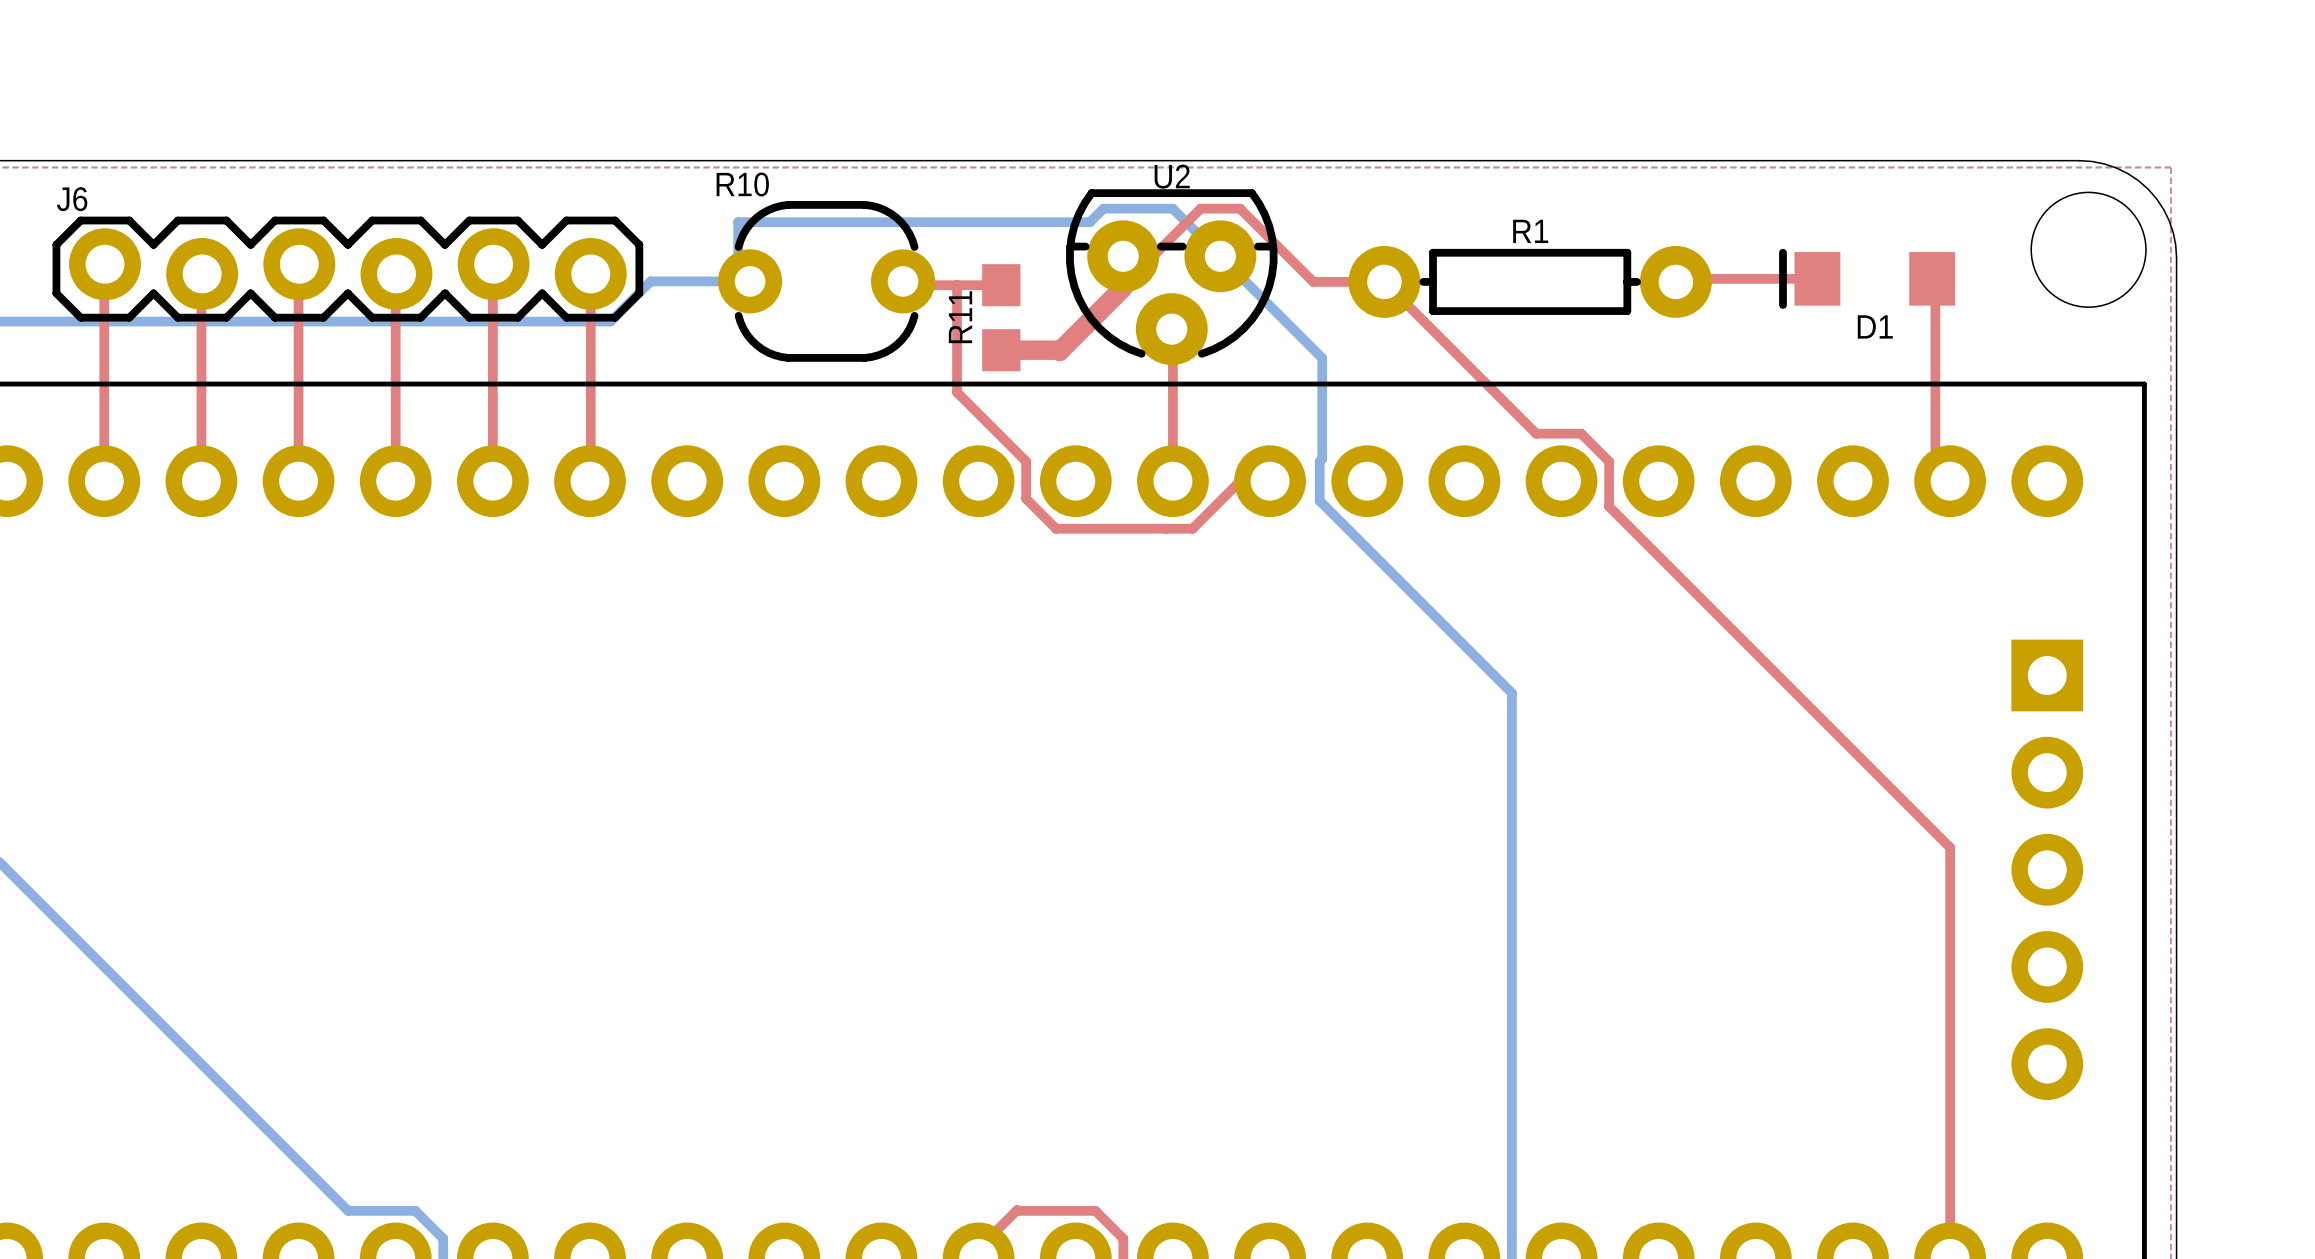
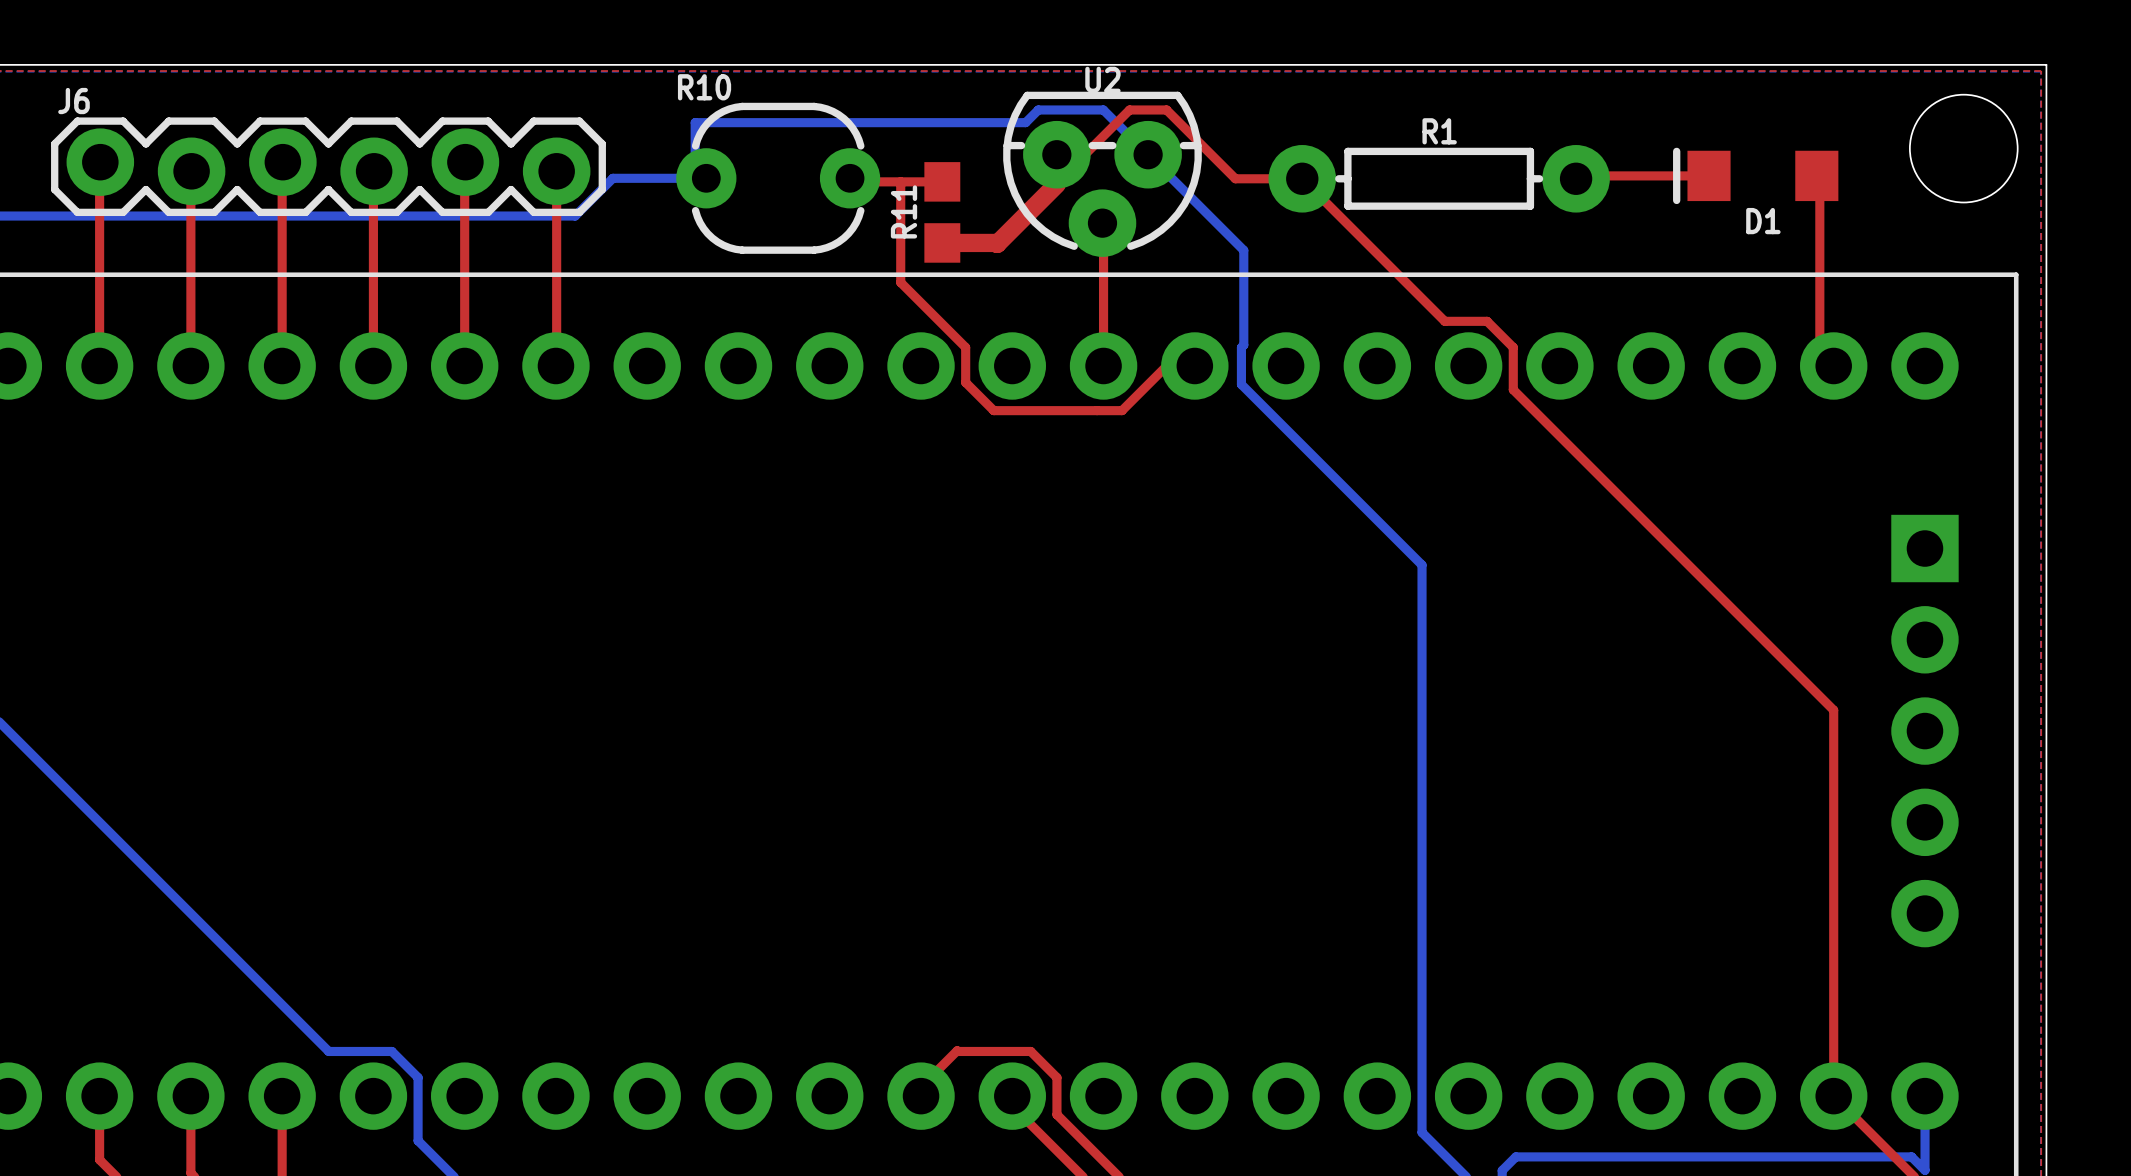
board edge: (2079, 160) (2104, 163) (2116, 168) (2138, 180) (2148, 189) (2156, 198) (2169, 220) (2173, 232) (2176, 257) -> (1955, 64) (2046, 64) (2046, 156)

